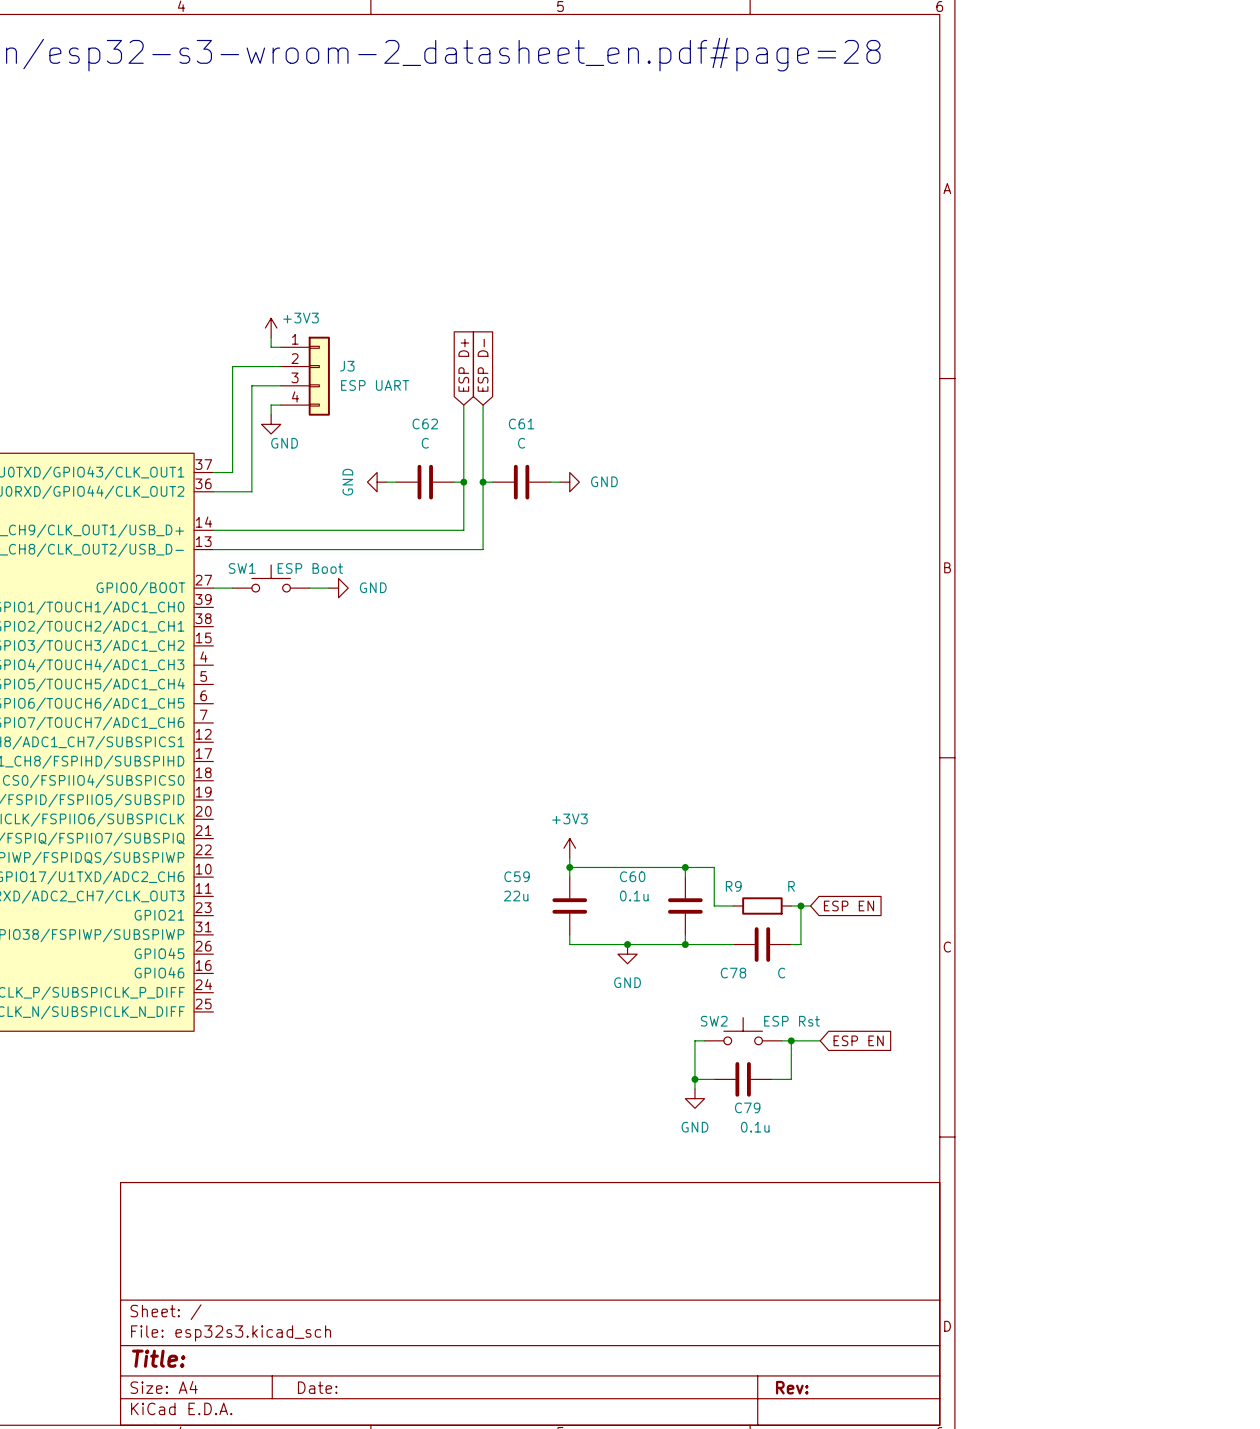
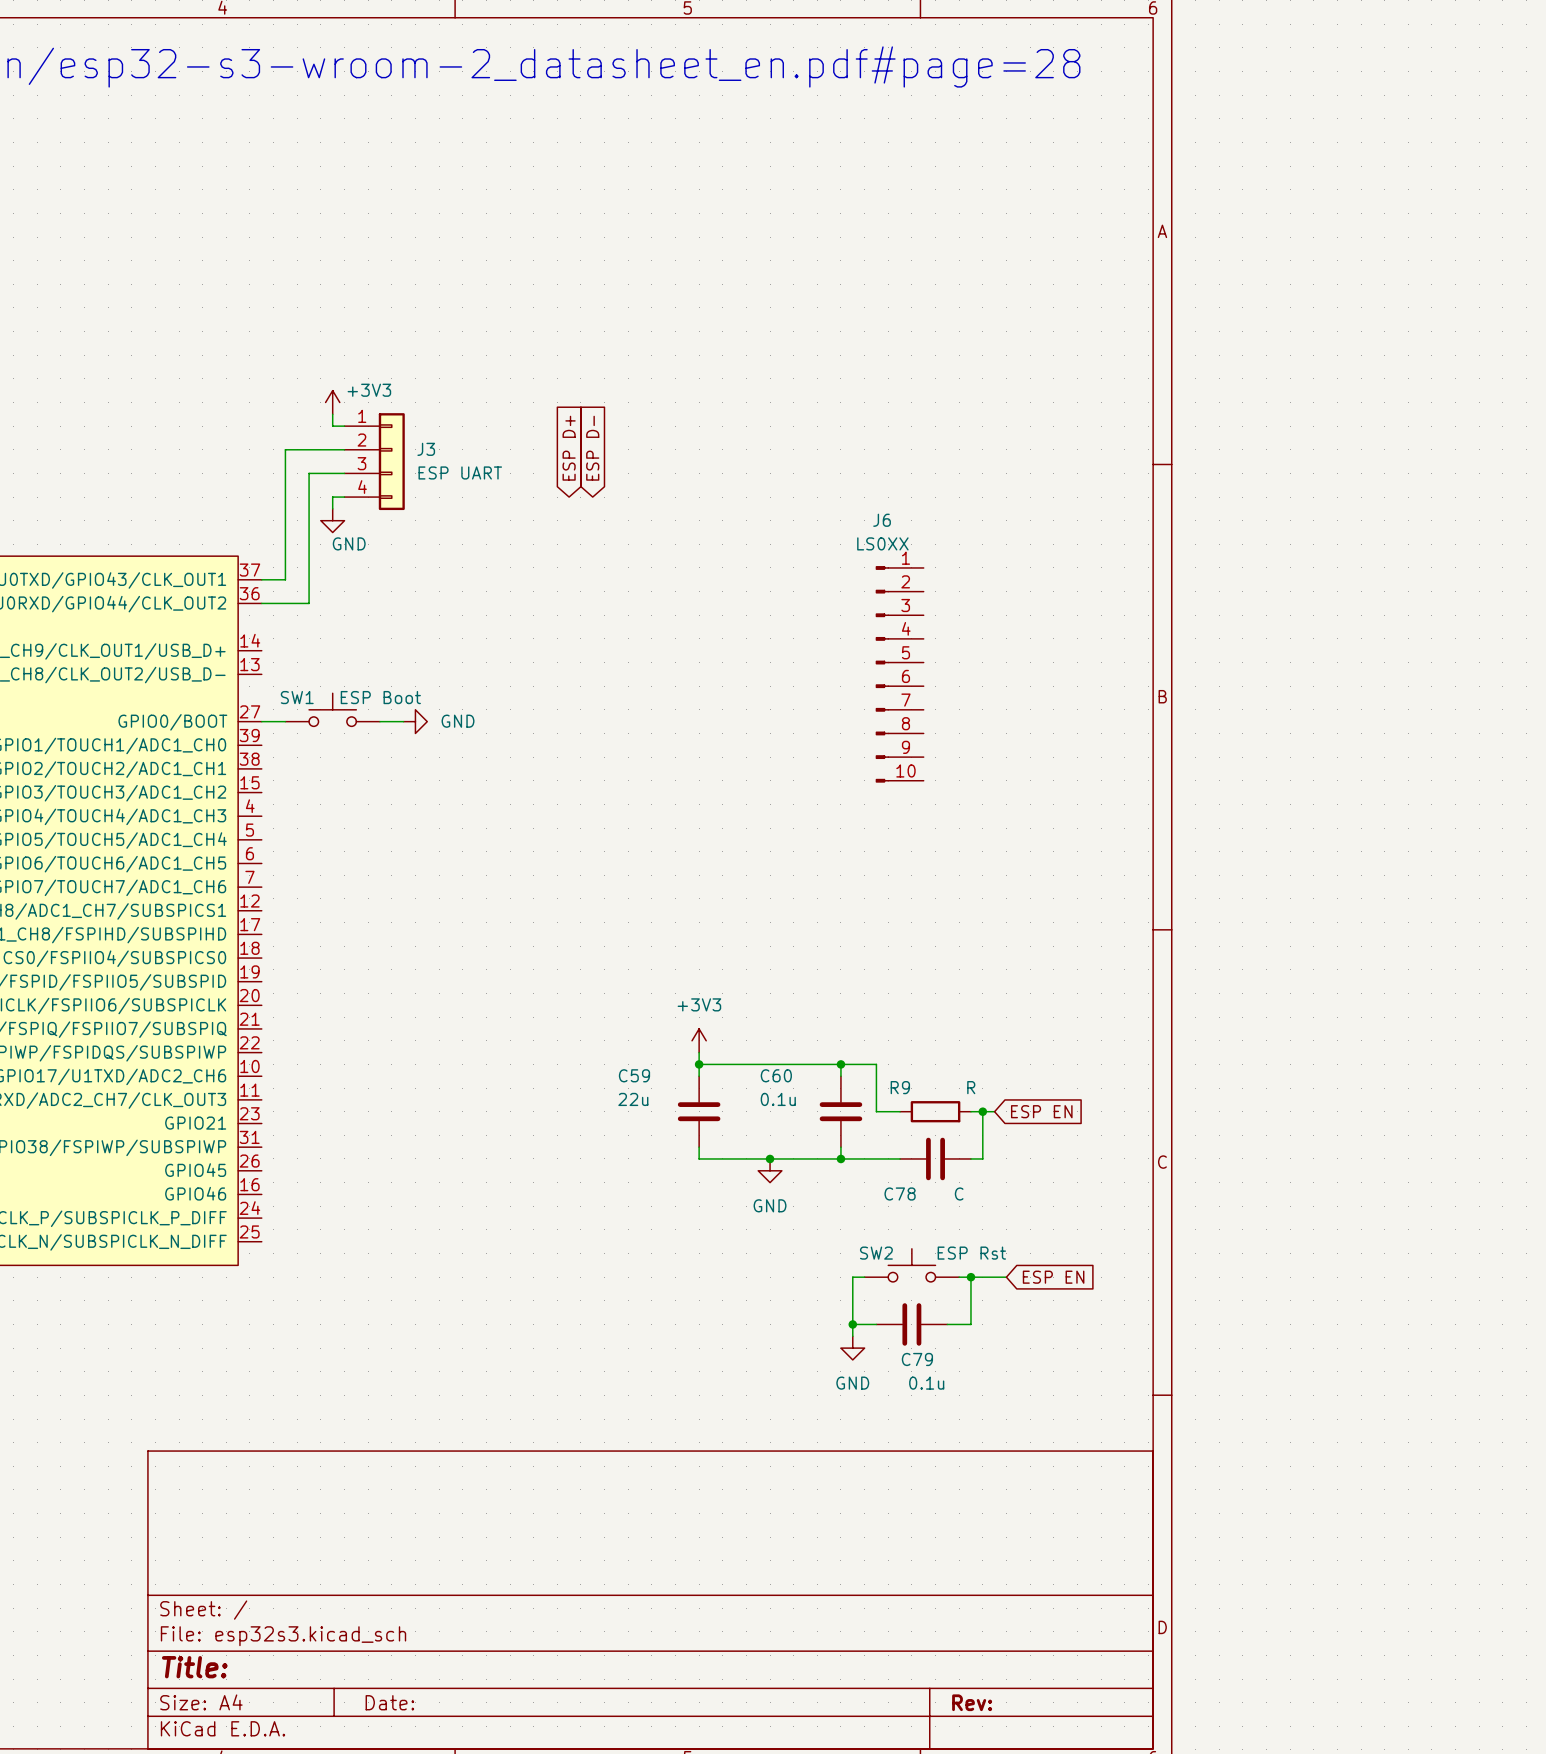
wire: (463, 405) (463, 530) (213, 530) -> none
wire: (483, 405) (483, 549) (213, 549) -> none
power symbol: GND (377, 482) -> none
wire: (386, 482) (396, 482) -> none
C62: C (425, 482) -> none
wire: (454, 482) (463, 482) -> none
junction: (463, 482) -> none
wire: (483, 482) (492, 482) -> none
junction: (483, 482) -> none
C61: C (521, 482) -> none
wire: (550, 482) (560, 482) -> none
power symbol: GND (569, 482) -> none
J6: none -> LS0XX (899, 674)

